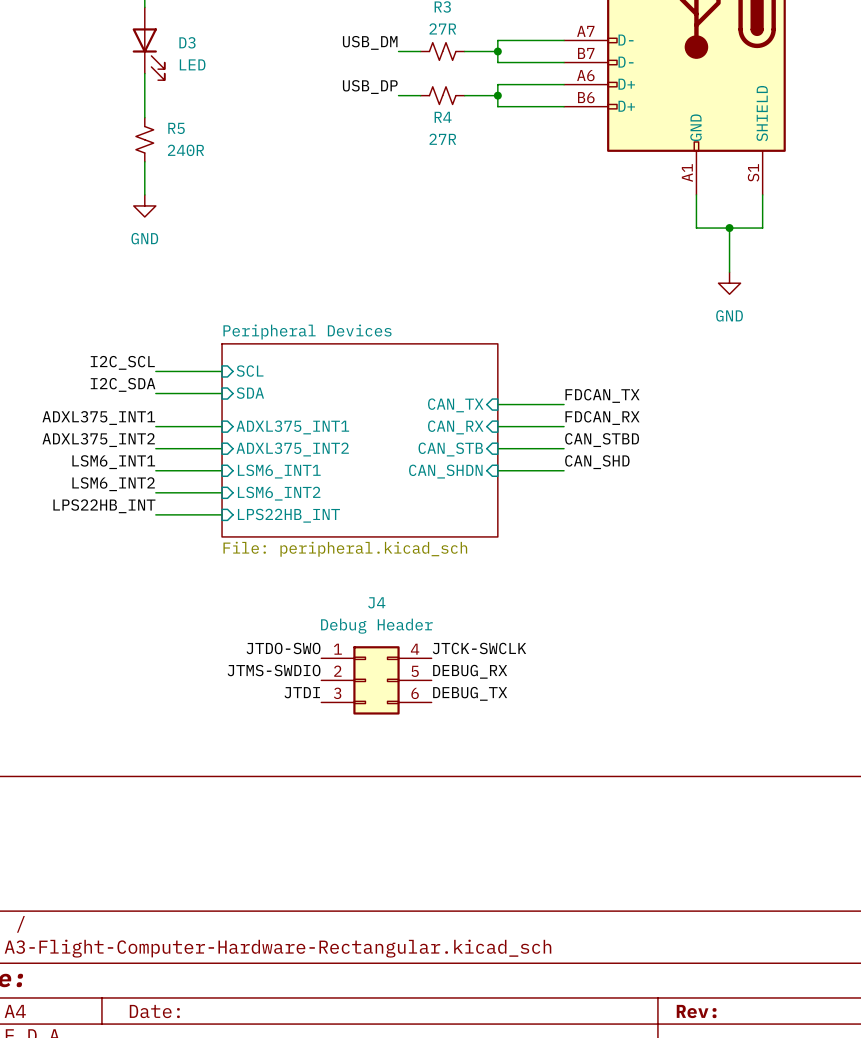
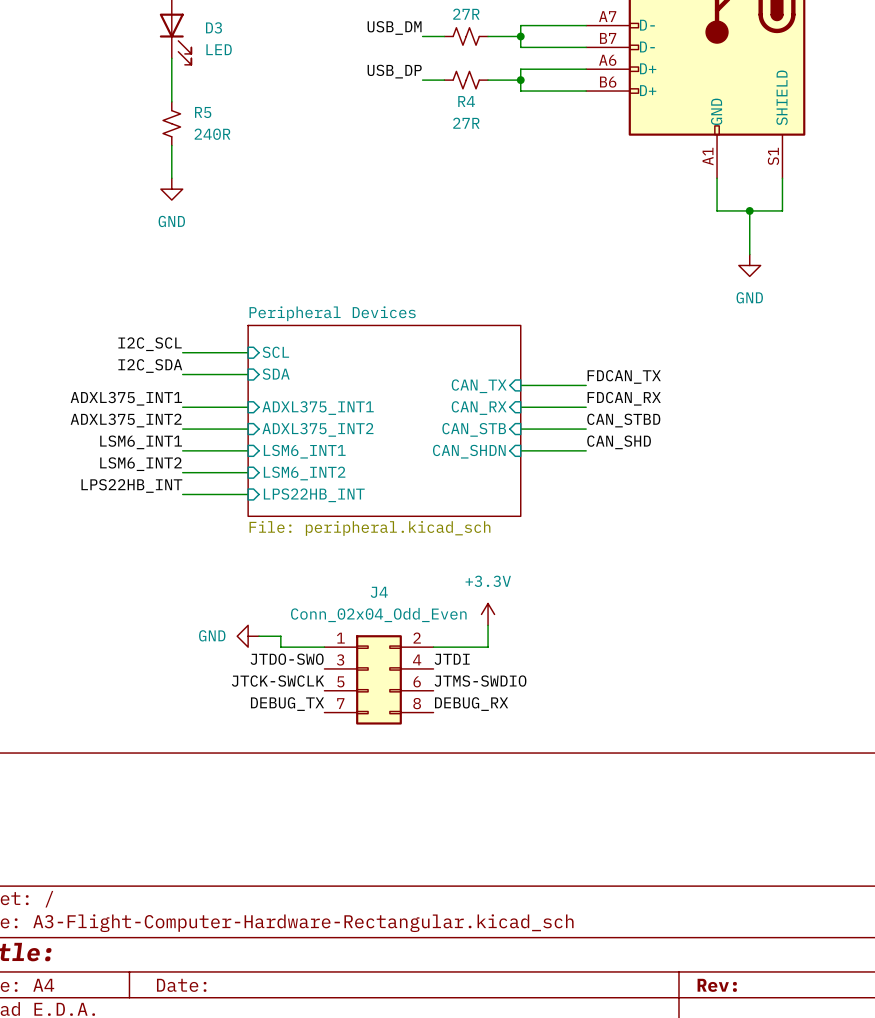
J4 value: Debug Header (376, 626) -> Conn_02x04_Odd_Even (378, 615)
power symbol: none -> +3.3V (488, 614)
J4 symbol: [321, 646, 432, 715] -> [324, 635, 434, 725]
wire: none -> (488, 625) (488, 647) (433, 647)
label position: JTDO-SWO (283, 648) -> JTDO-SWO (287, 659)
label position: JTCK-SWCLK (479, 648) -> JTCK-SWCLK (277, 681)
power symbol: none -> GND (248, 636)
wire: none -> (259, 636) (280, 636) (280, 647) (324, 647)
label position: JTMS-SWDIO (274, 670) -> JTMS-SWDIO (480, 681)
label position: DEBUG_RX (470, 671) -> DEBUG_RX (471, 704)
label position: JTDI (302, 692) -> JTDI (452, 659)
label position: DEBUG_TX (470, 693) -> DEBUG_TX (287, 704)

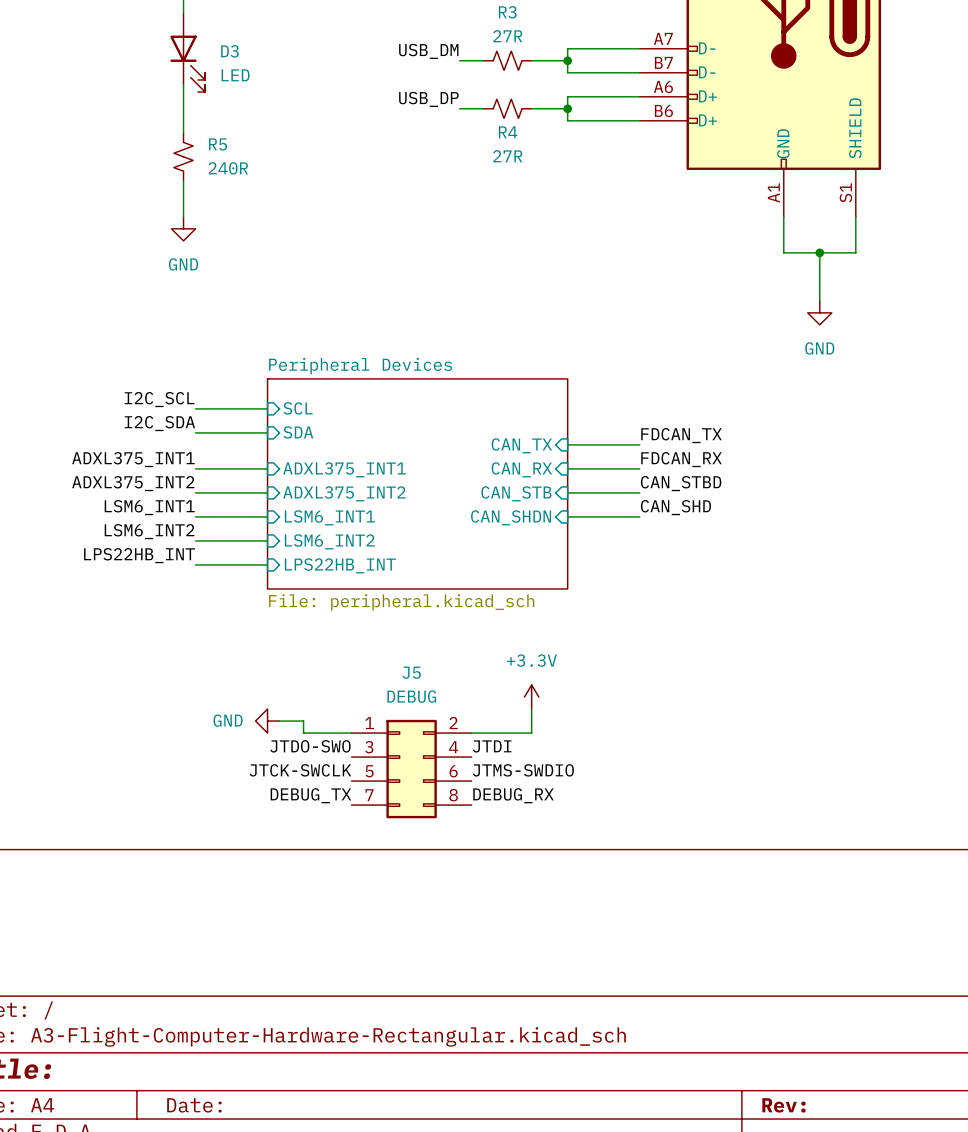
J4 name: J4 (379, 592) -> J5 (411, 672)
J4 value: Conn_02x04_Odd_Even (378, 615) -> DEBUG (411, 696)

